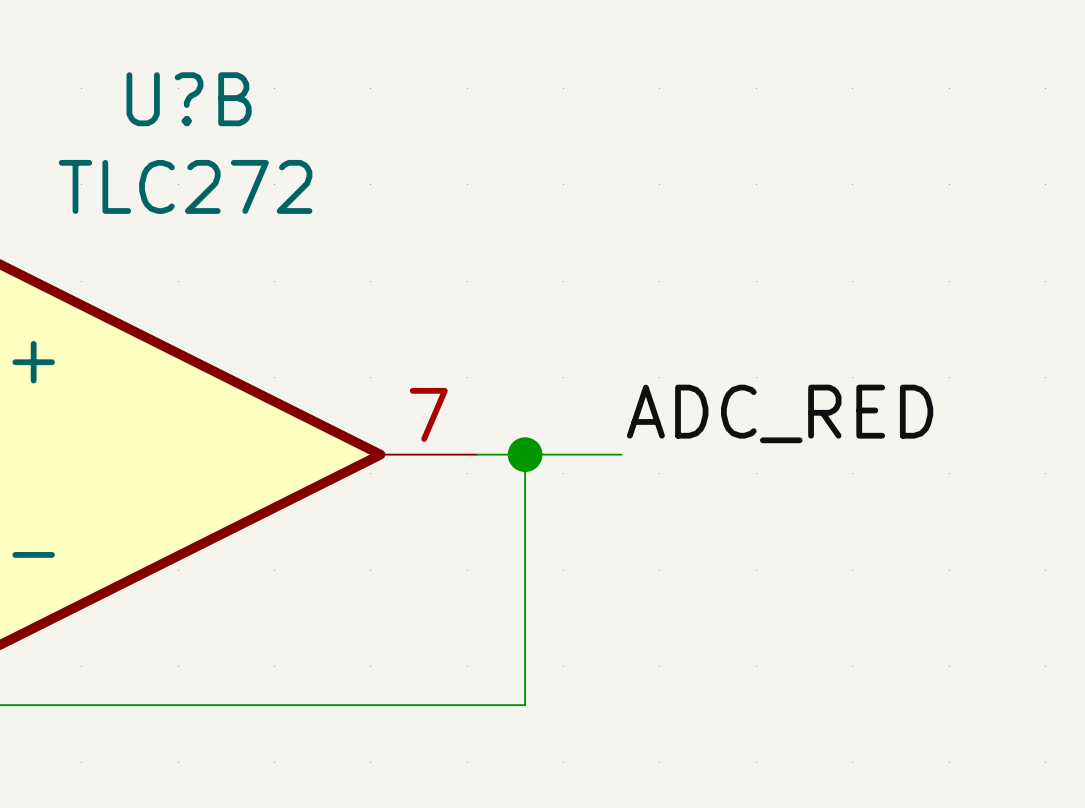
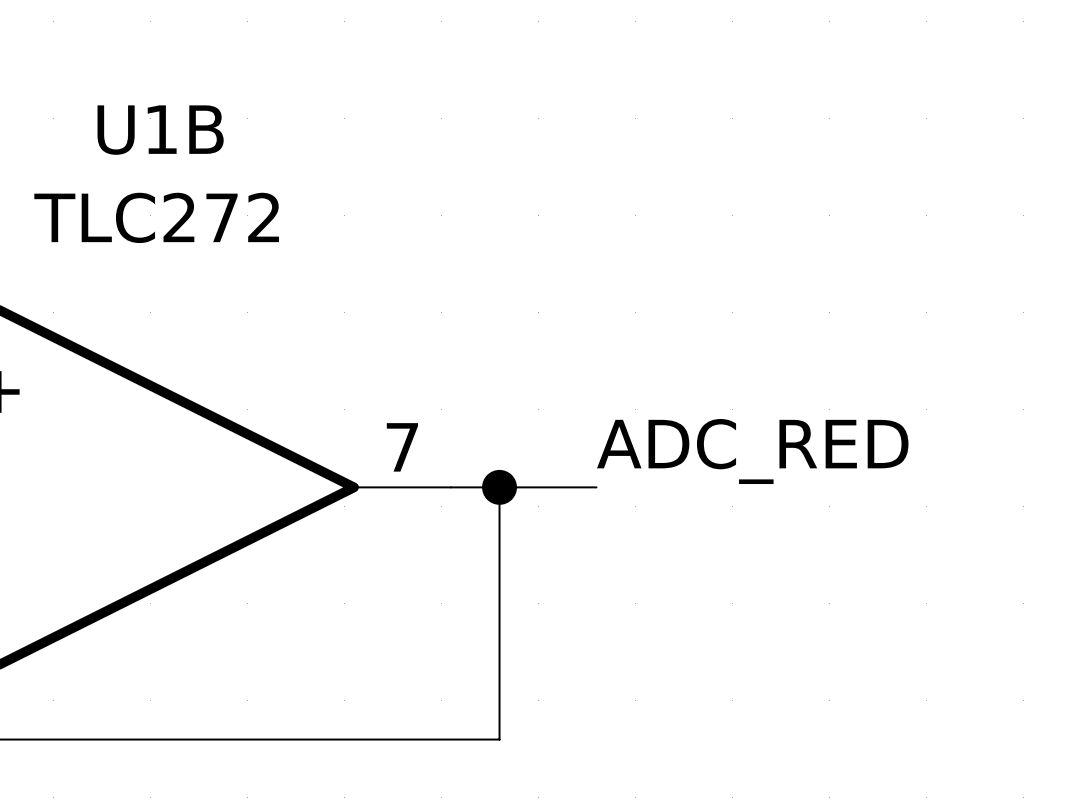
U?B name: U?B (189, 99) -> U1B (160, 130)

